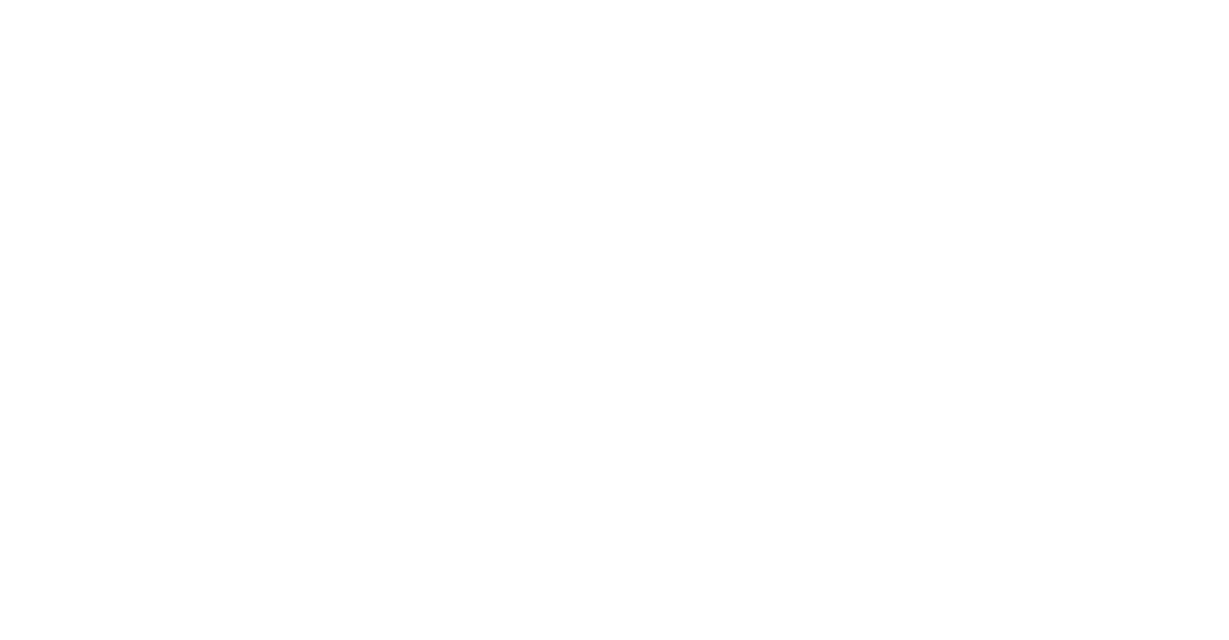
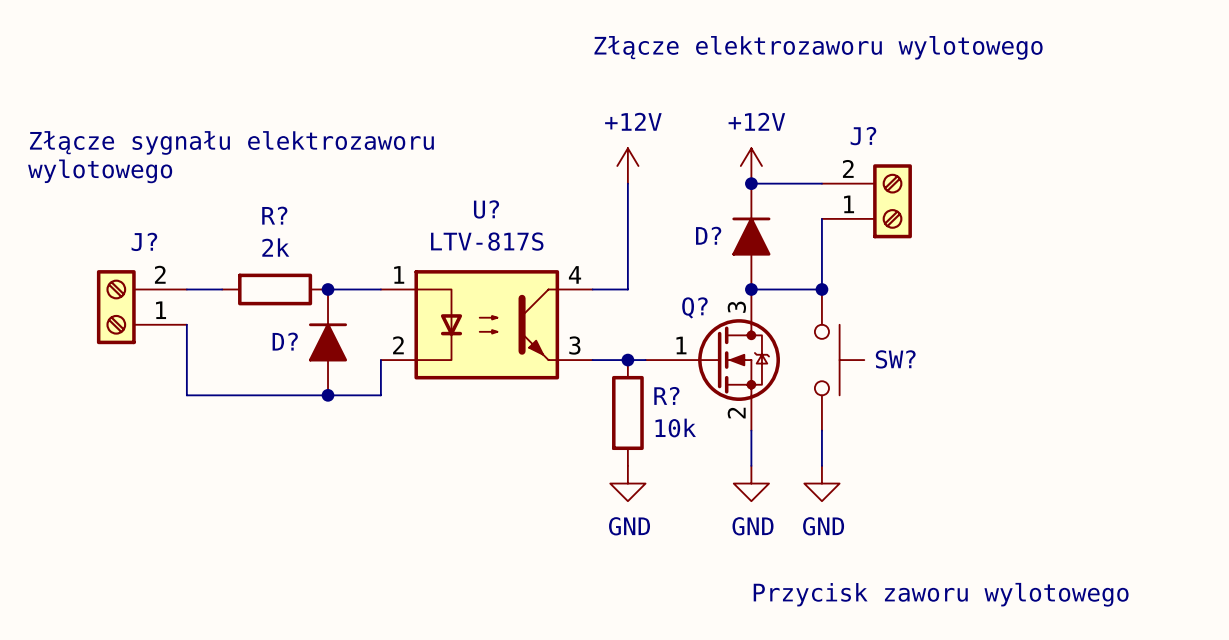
text: none -> Złącze elektrozaworu wylotowego (818, 47)
text: none -> Złącze sygnału elektrozaworu (231, 142)
power symbol: none -> +12V (627, 166)
power symbol: none -> +12V (751, 166)
text: none -> wylotowego (100, 171)
wire: none -> (627, 183) (627, 289) (592, 289)
wire: none -> (751, 183) (821, 183)
junction: none -> (751, 183)
J?: none -> (866, 201)
wire: none -> (821, 218) (821, 289) (751, 289)
D?: none -> (751, 236)
wire: none -> (186, 289) (222, 289)
R?: none -> 2k (275, 289)
wire: none -> (328, 289) (380, 289)
junction: none -> (328, 289)
junction: none -> (751, 289)
junction: none -> (821, 289)
J?: none -> (141, 307)
wire: none -> (186, 324) (186, 395) (380, 395) (380, 360)
U?: none -> LTV-817S (486, 324)
D?: none -> (328, 342)
wire: none -> (592, 360) (645, 360)
junction: none -> (627, 360)
Q?: none -> (712, 360)
SW?: none -> (839, 360)
junction: none -> (328, 395)
R?: none -> 10k (627, 412)
wire: none -> (751, 430) (751, 465)
wire: none -> (821, 430) (821, 465)
power symbol: none -> GND (627, 483)
power symbol: none -> GND (751, 483)
power symbol: none -> GND (821, 483)
text: none -> Przycisk zaworu wylotowego (941, 594)

